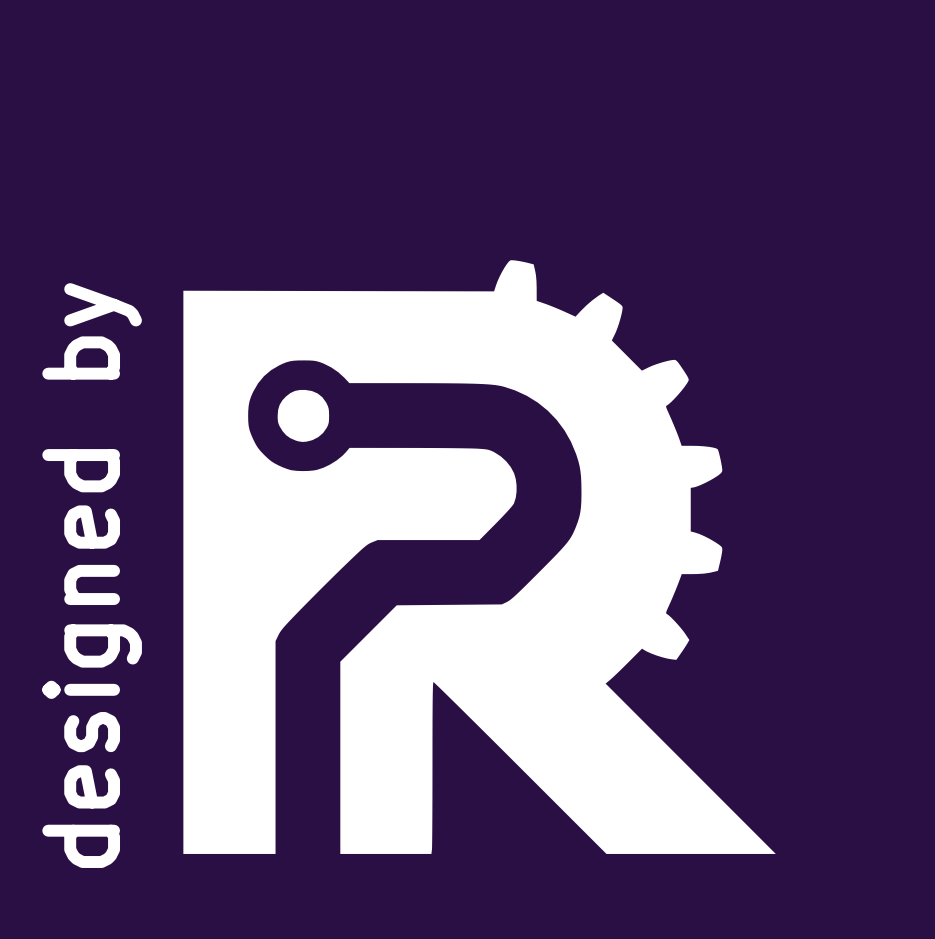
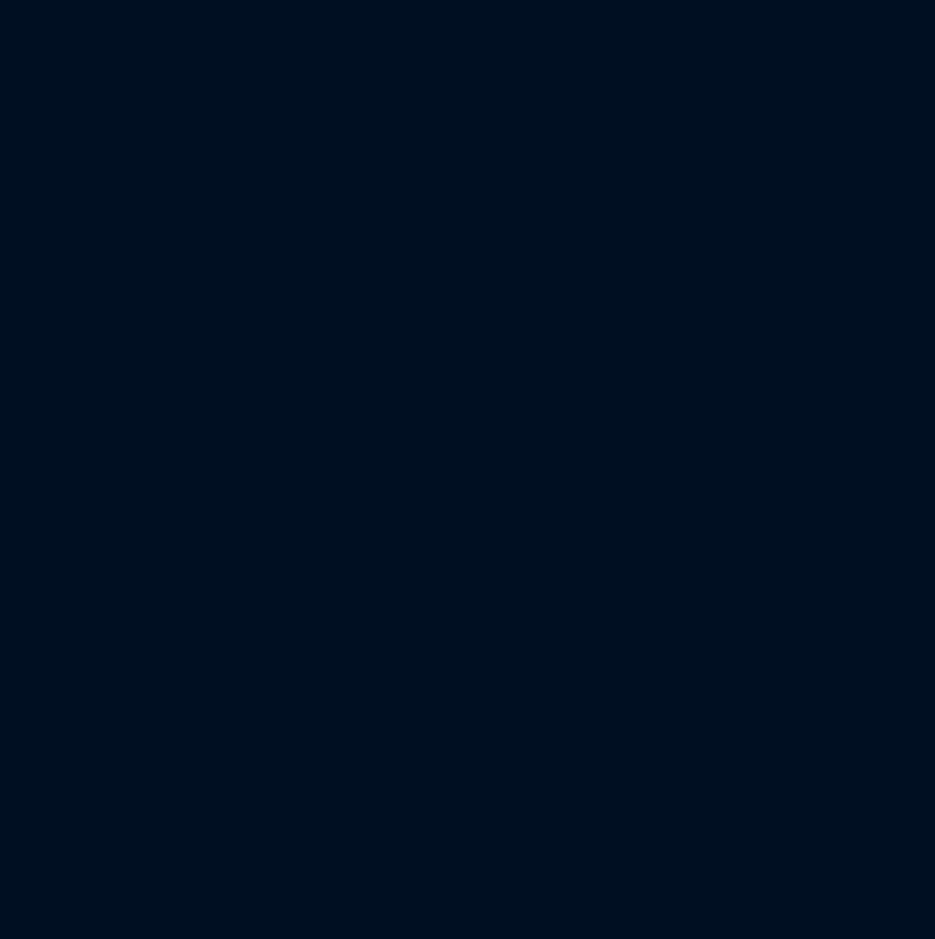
drawing: [183, 260, 776, 854] -> none
text: designed by (92, 575) -> none

